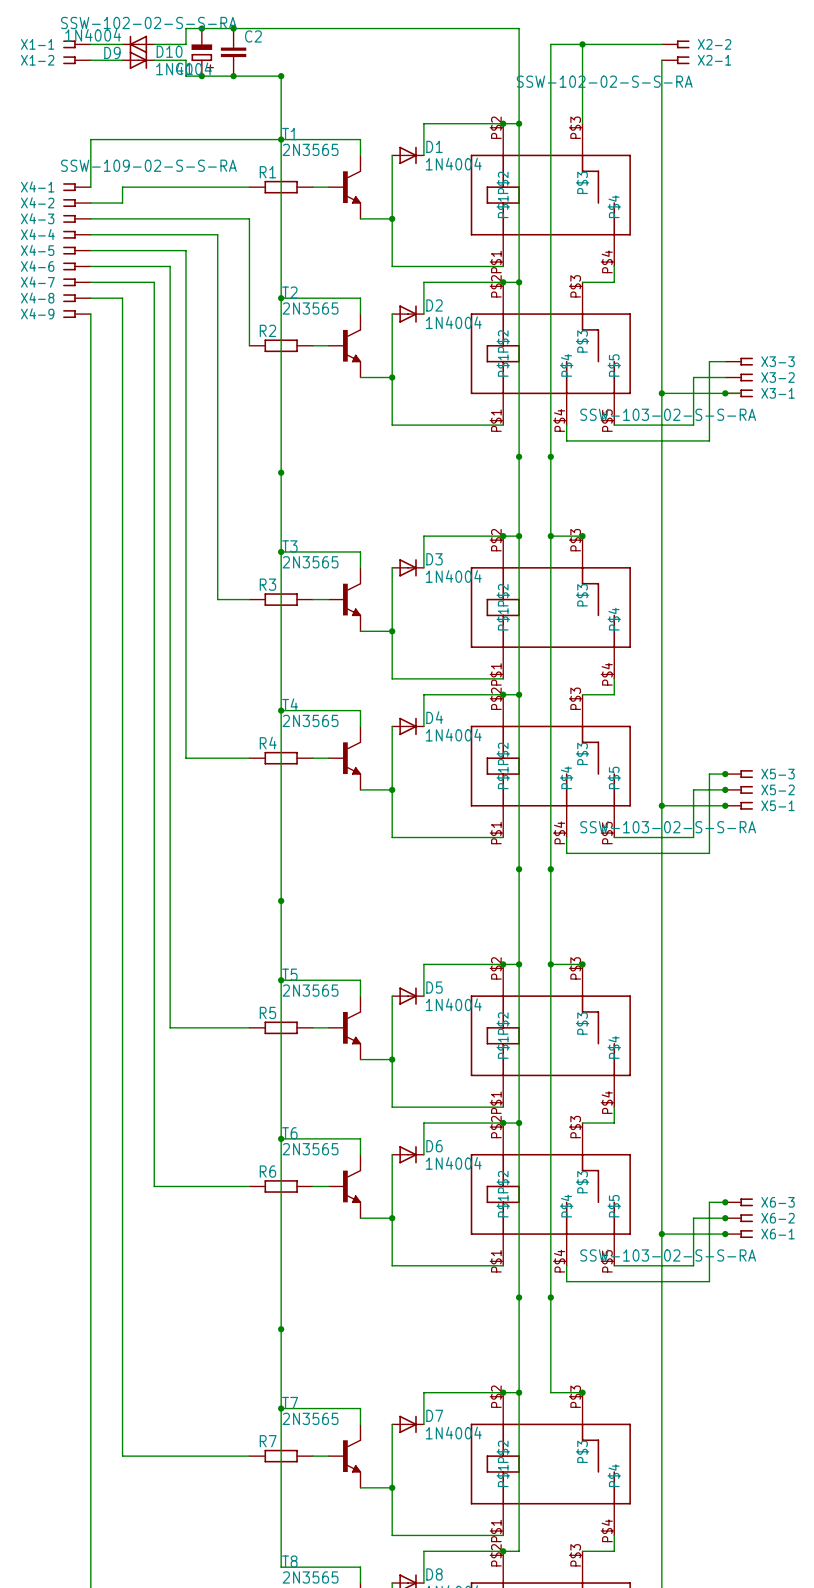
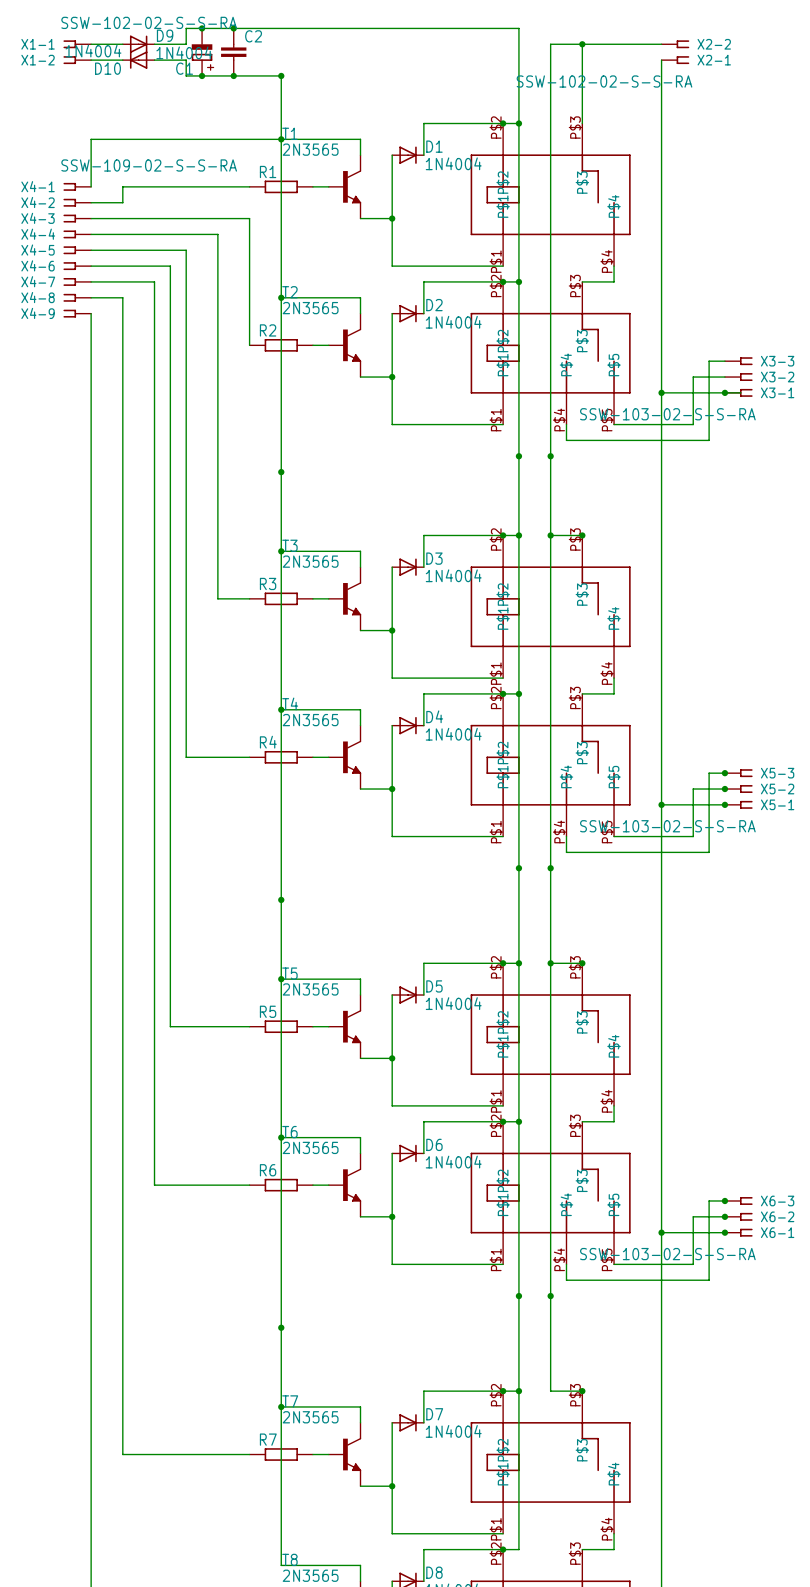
D9 rotation: 0° (138, 44) -> 180° (138, 44)
D10 rotation: 0° (138, 60) -> 180° (138, 60)

